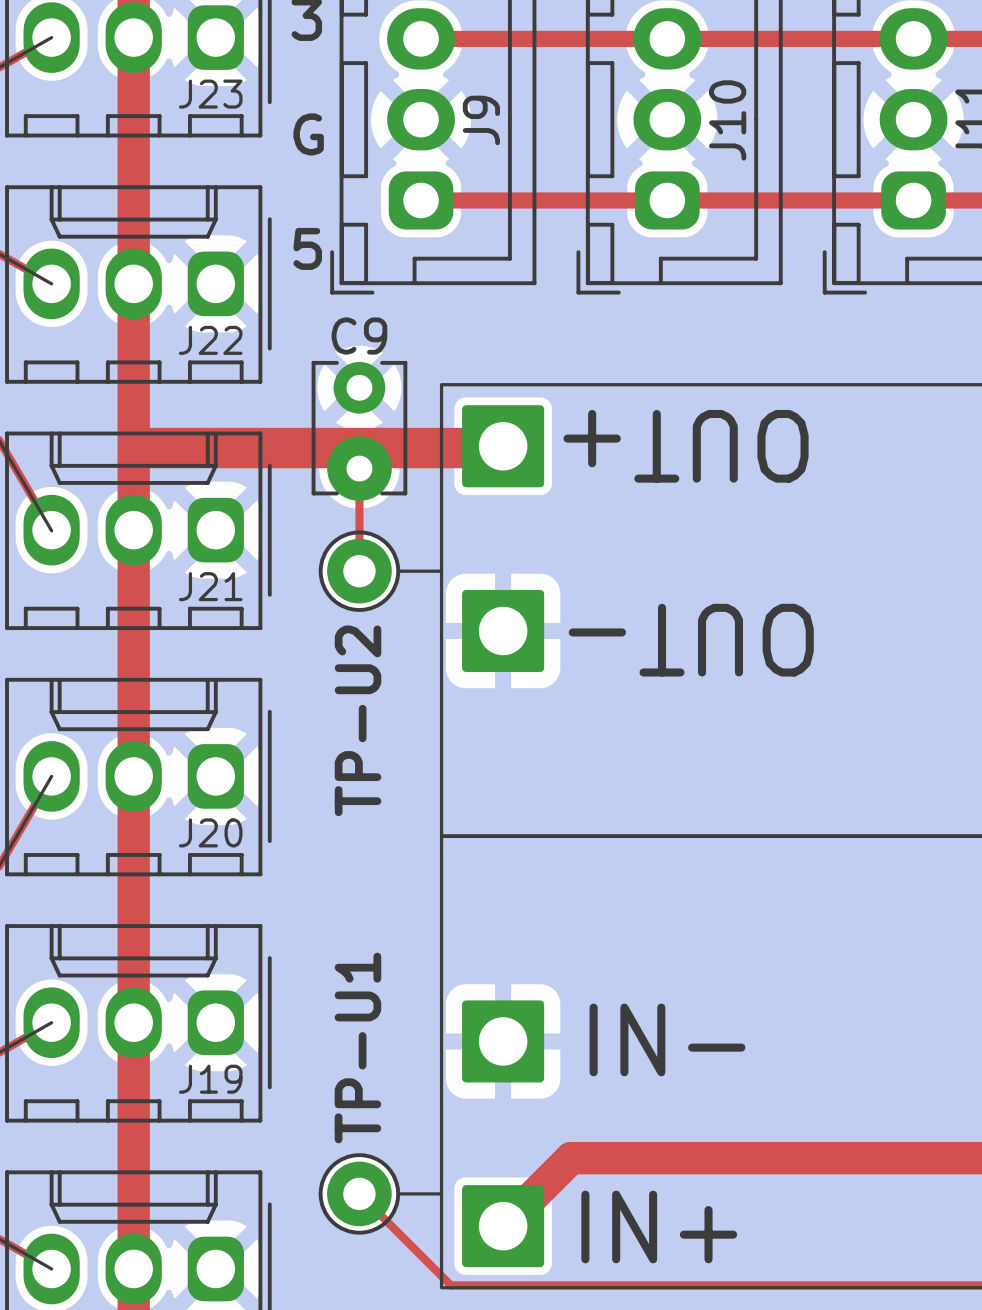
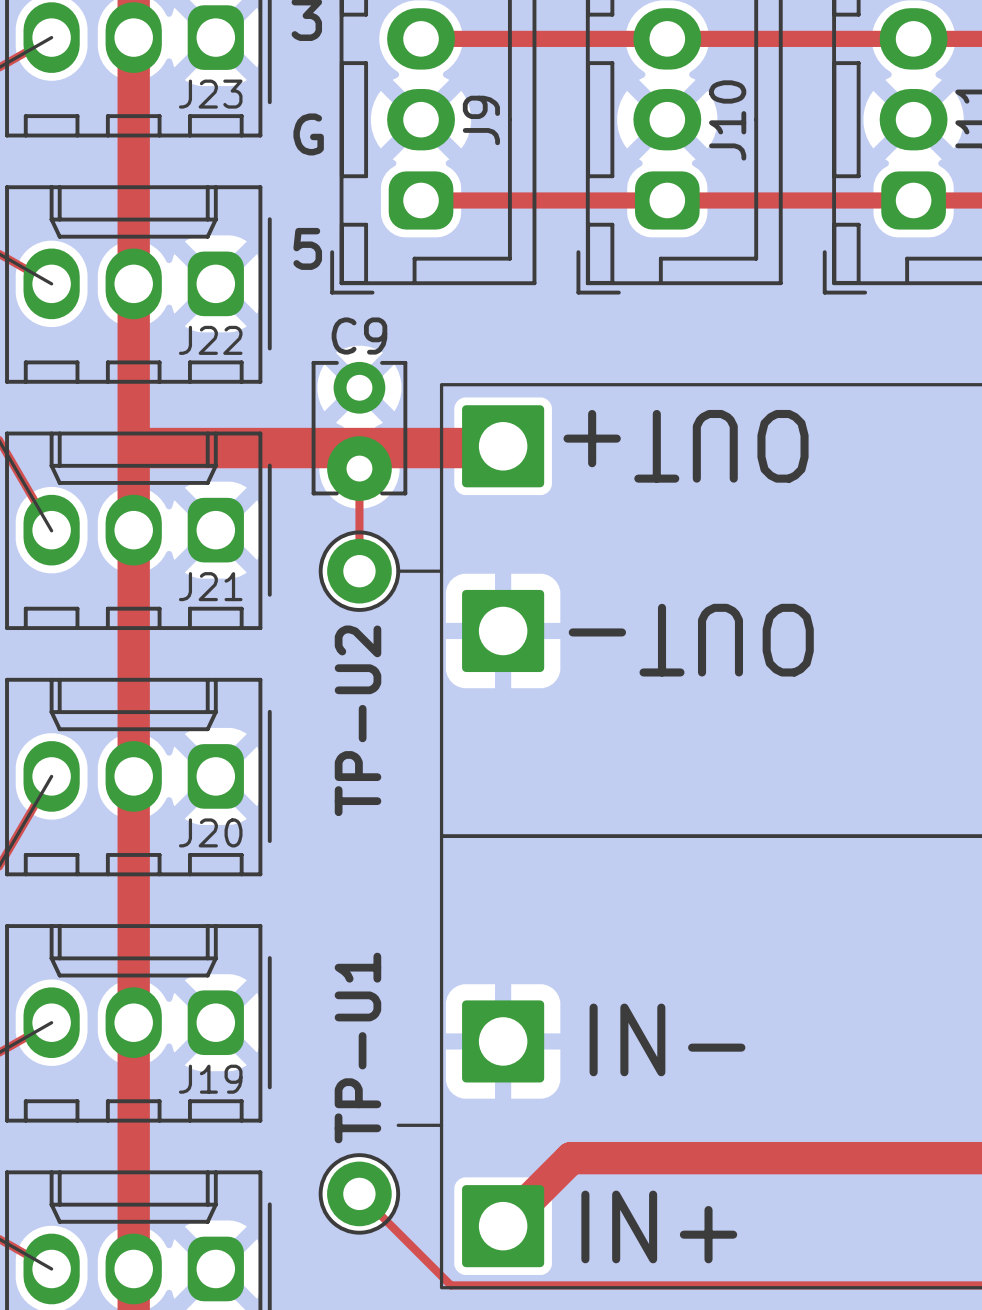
line: (398, 1193) (441, 1193) -> (398, 1125) (441, 1125)

